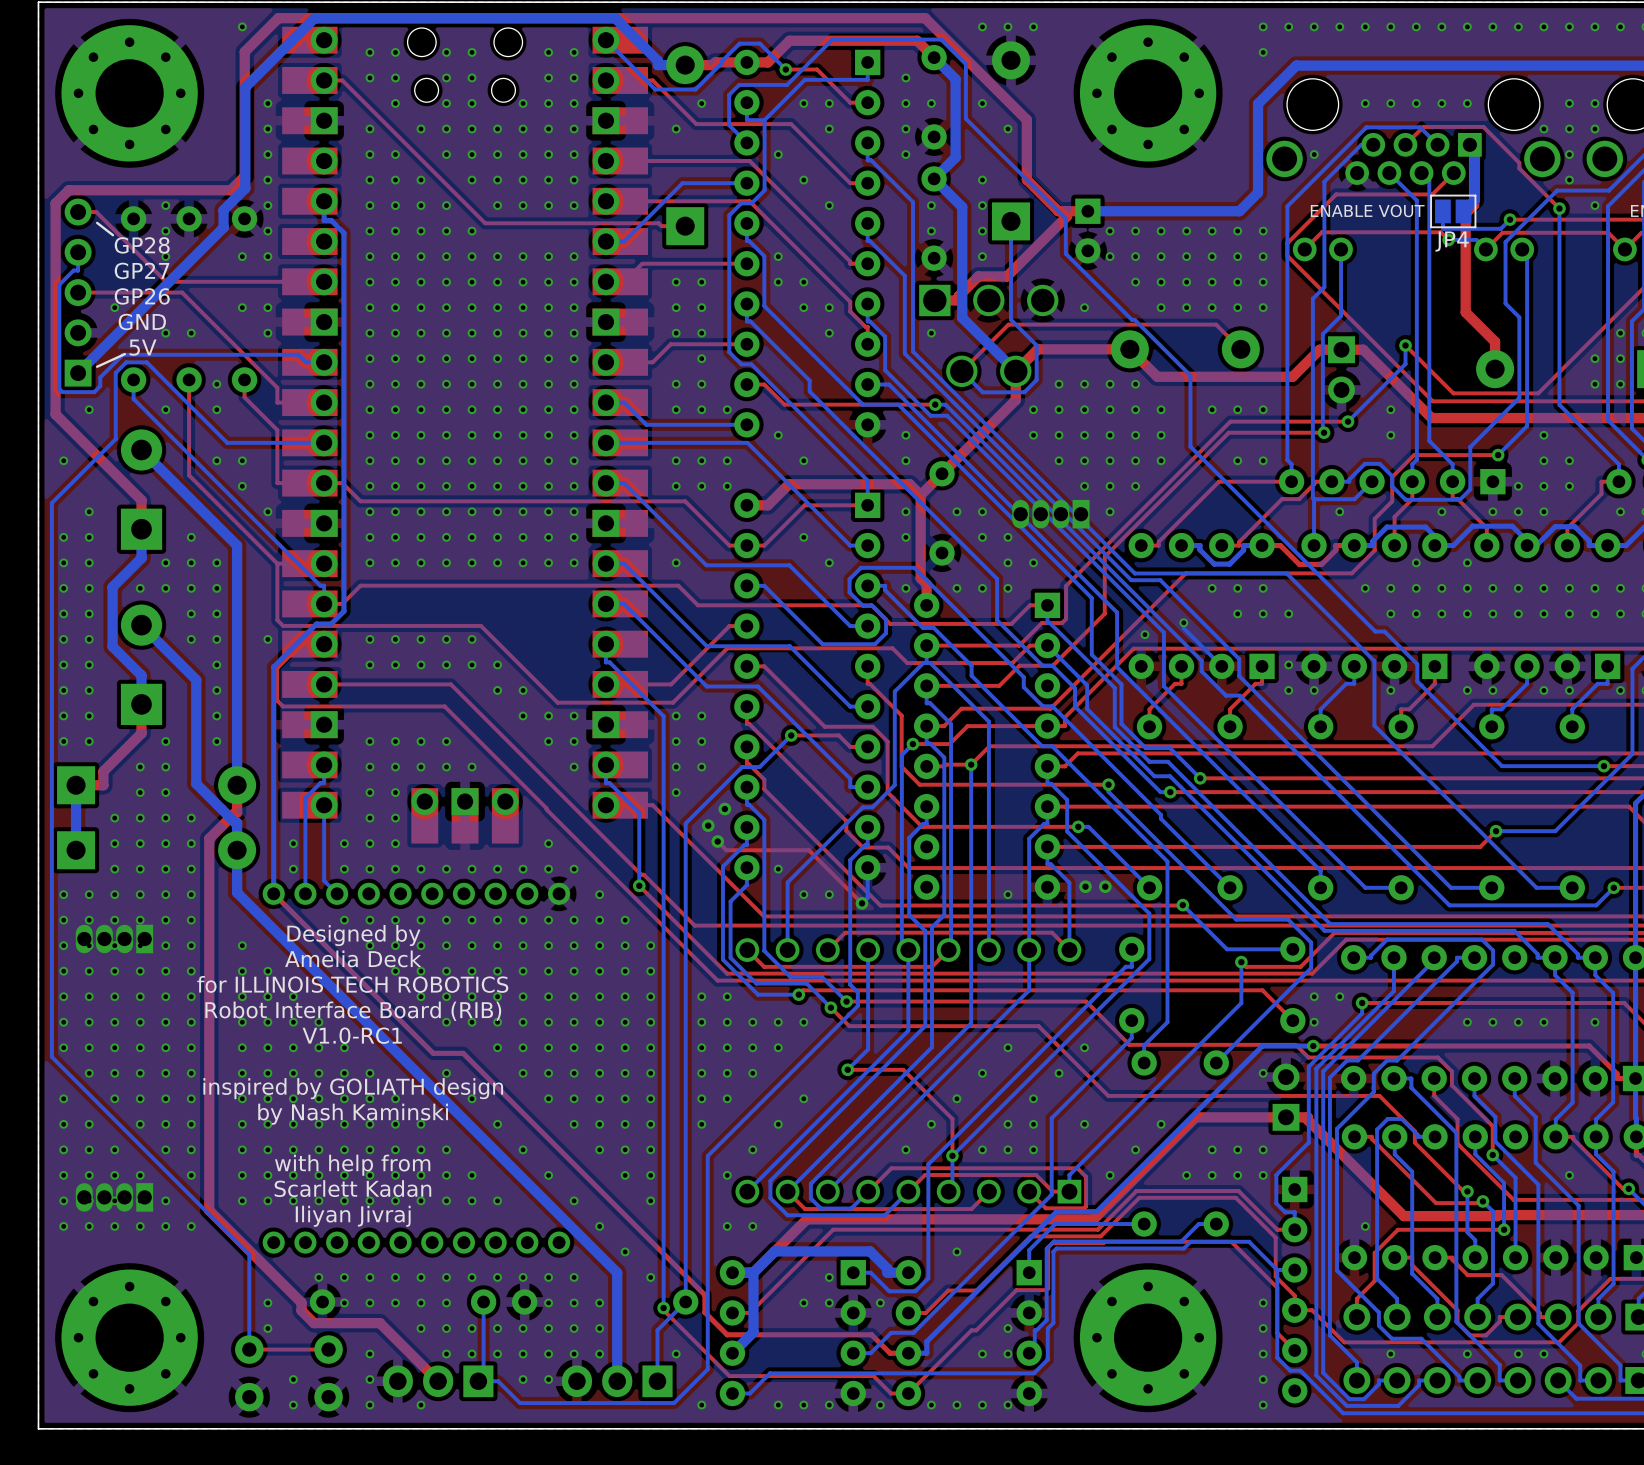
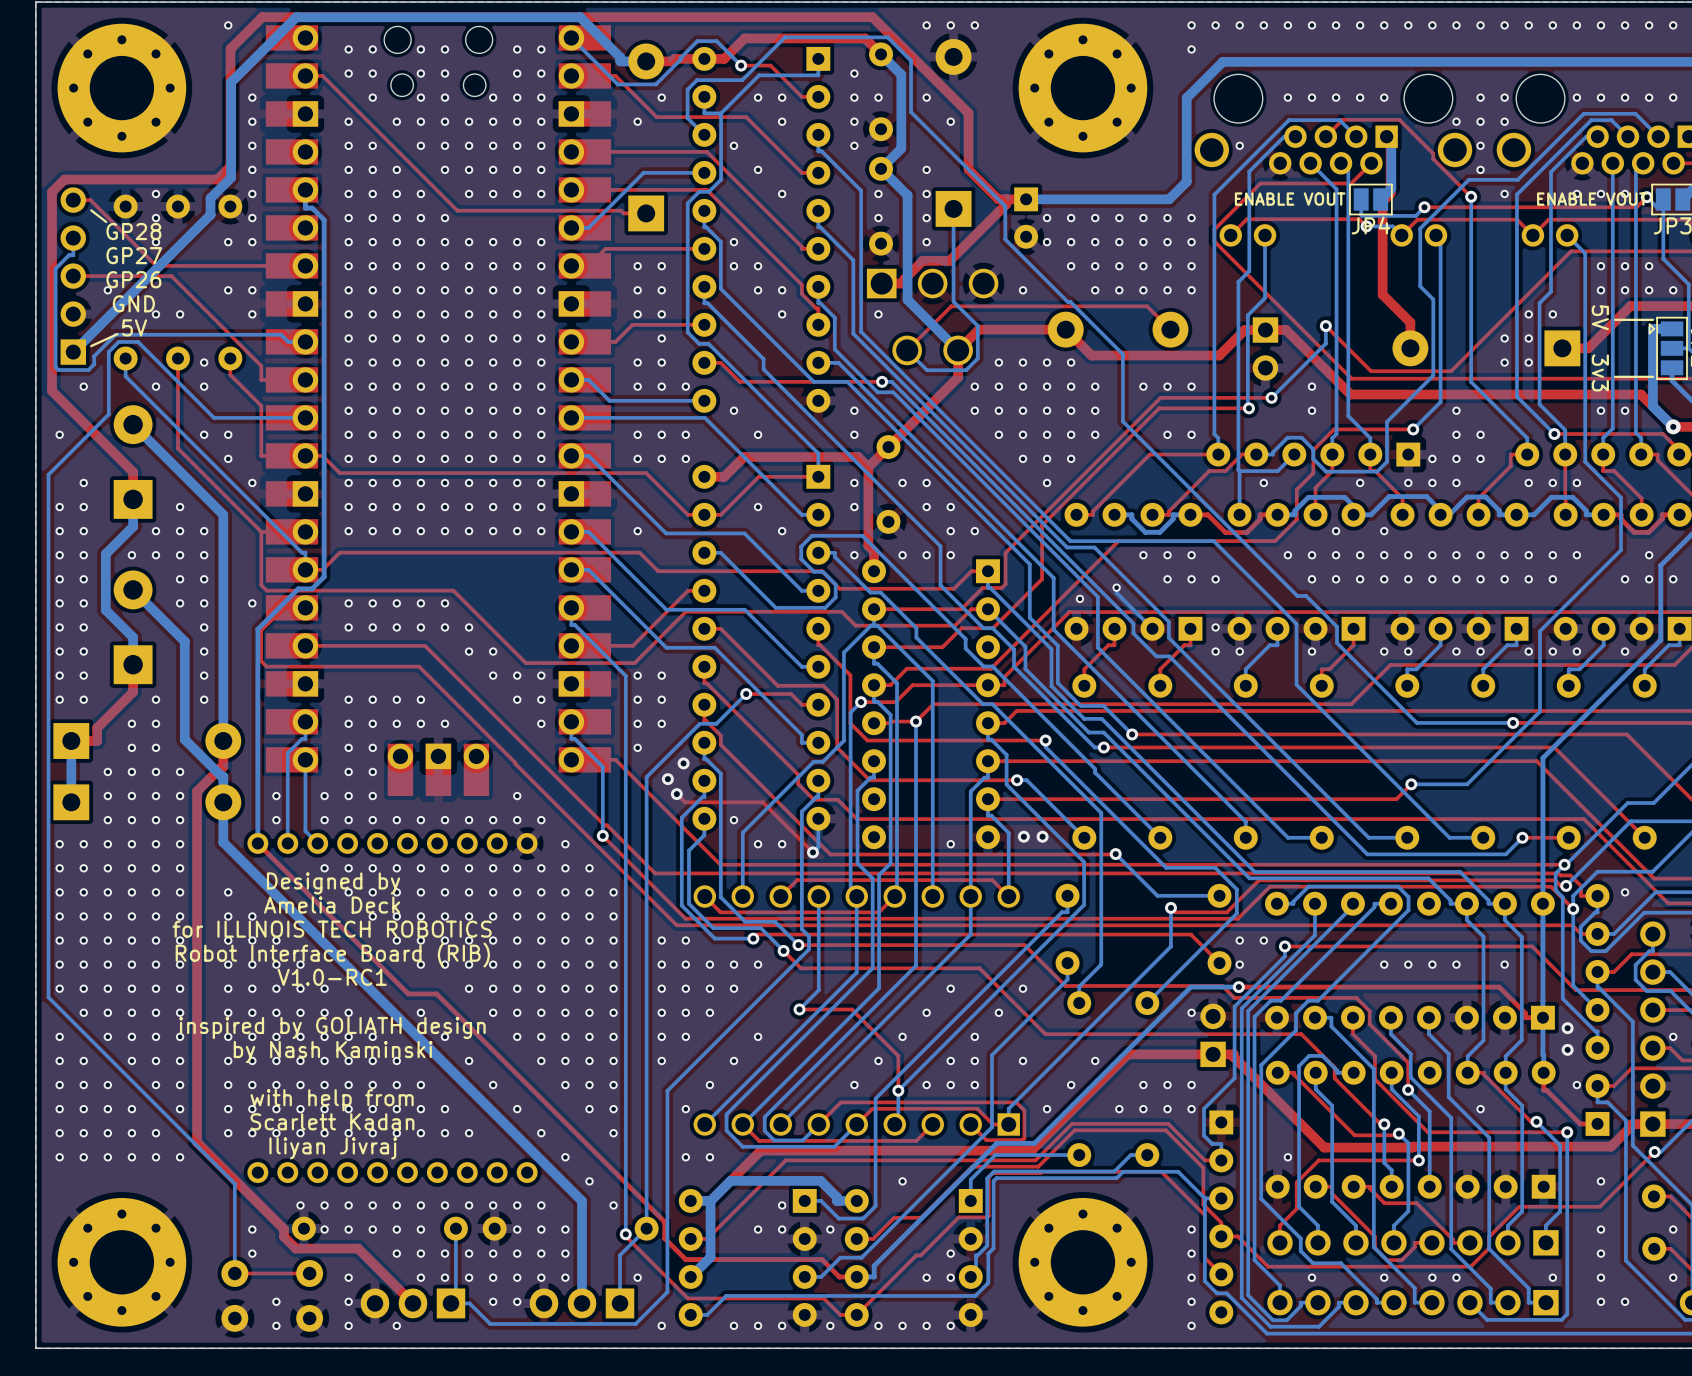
part: (1050, 514) -> none
part: (114, 939) -> none
part: (114, 1197) -> none

